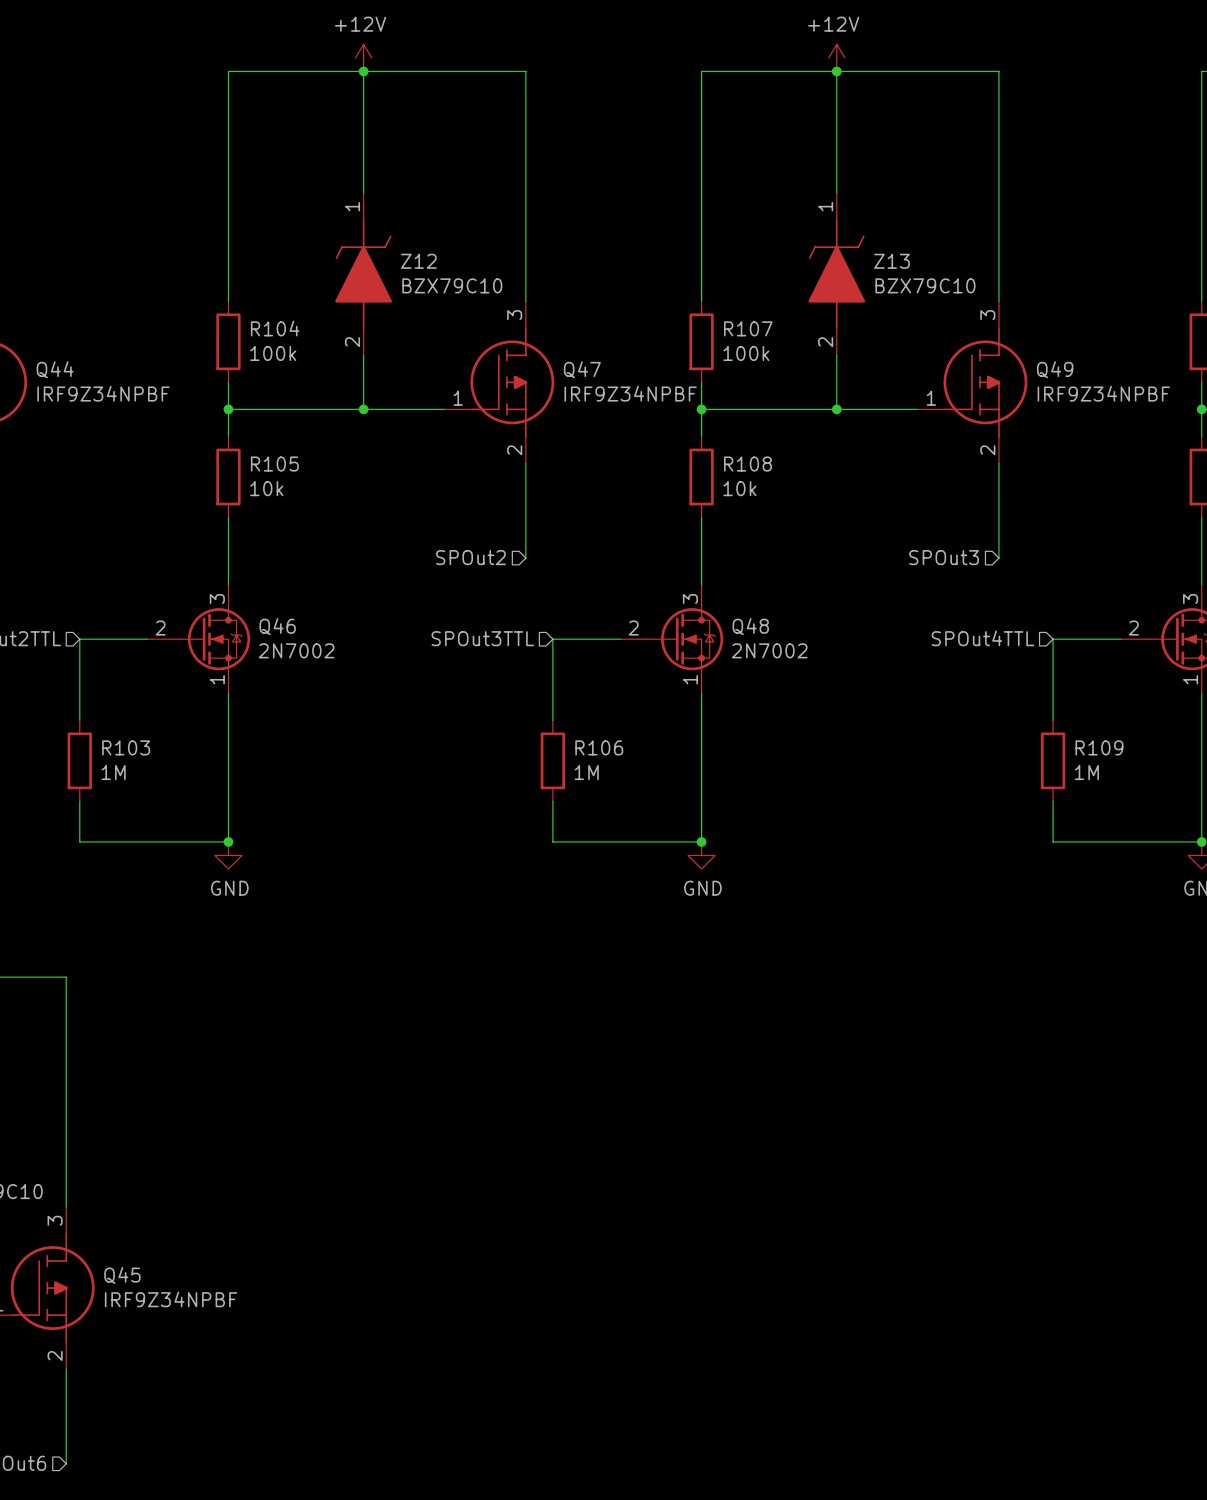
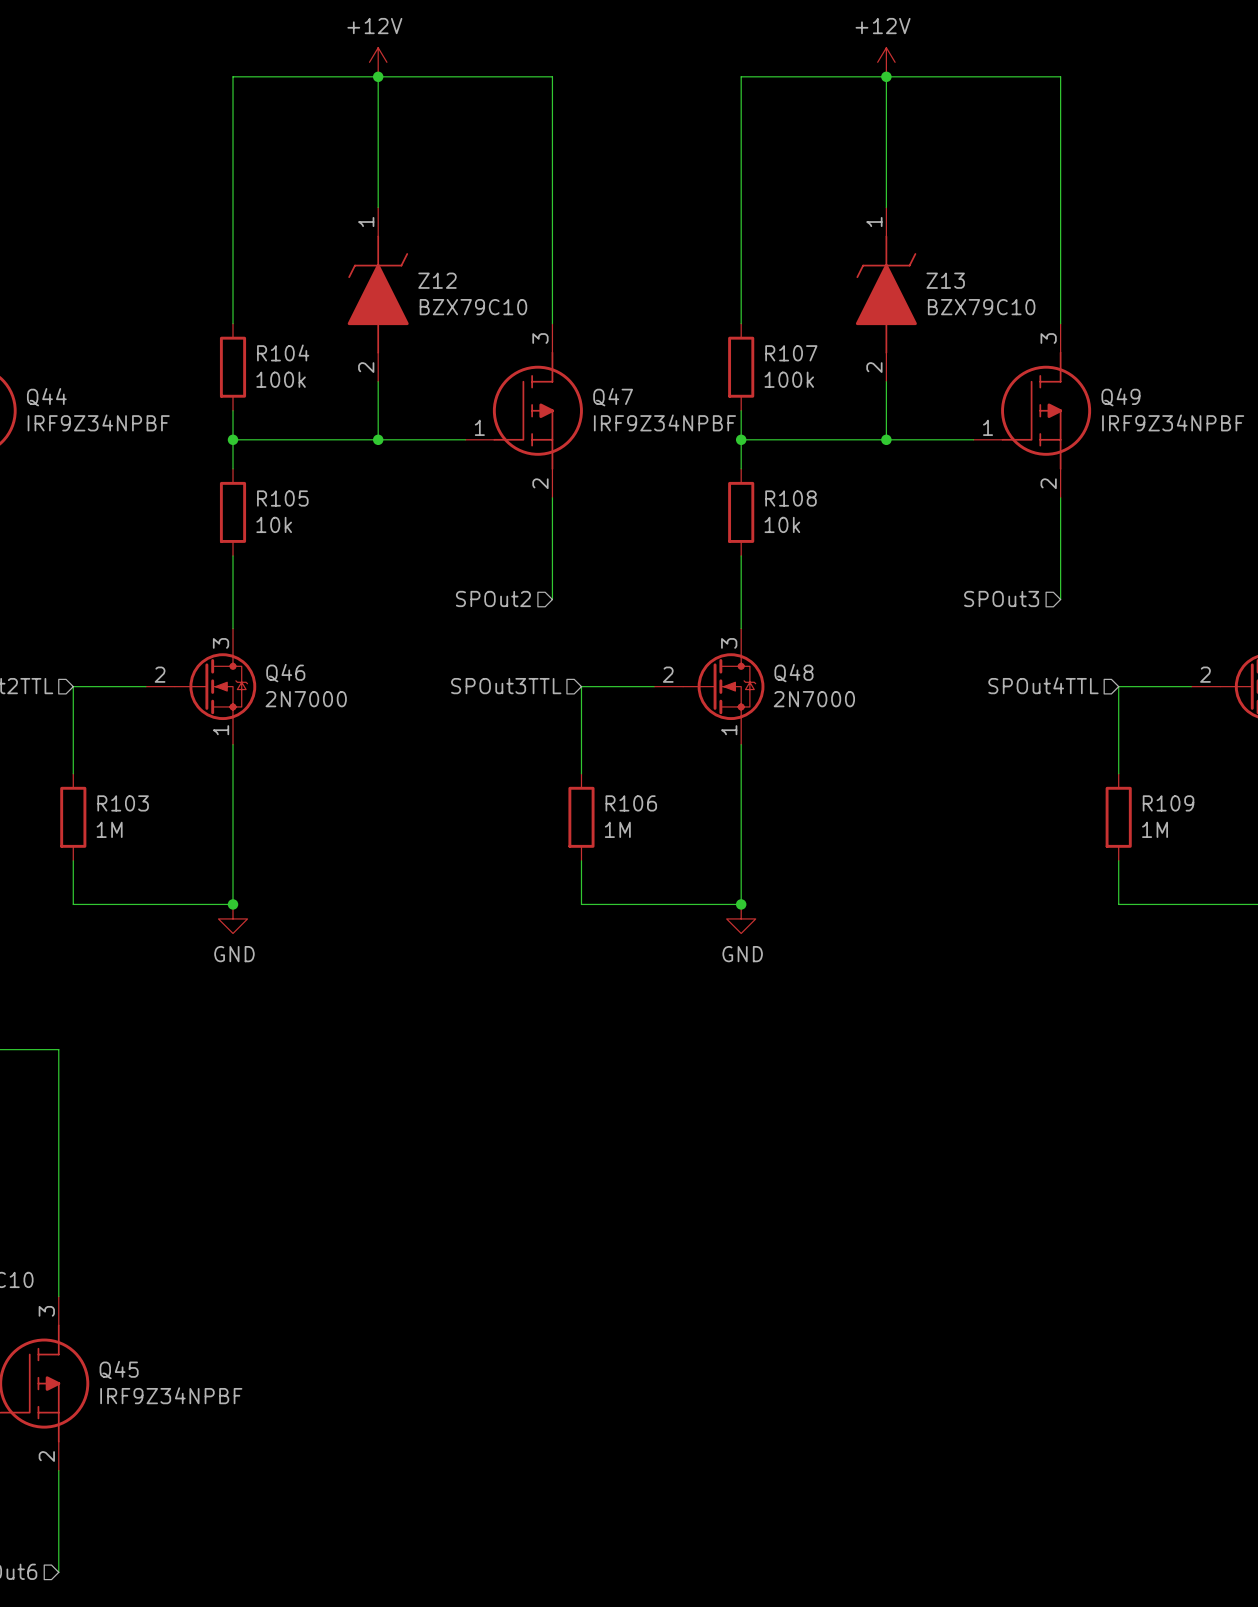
Q46 value: 2N7002 (296, 650) -> 2N7000 (306, 699)
Q48 value: 2N7002 (769, 650) -> 2N7000 (814, 699)

